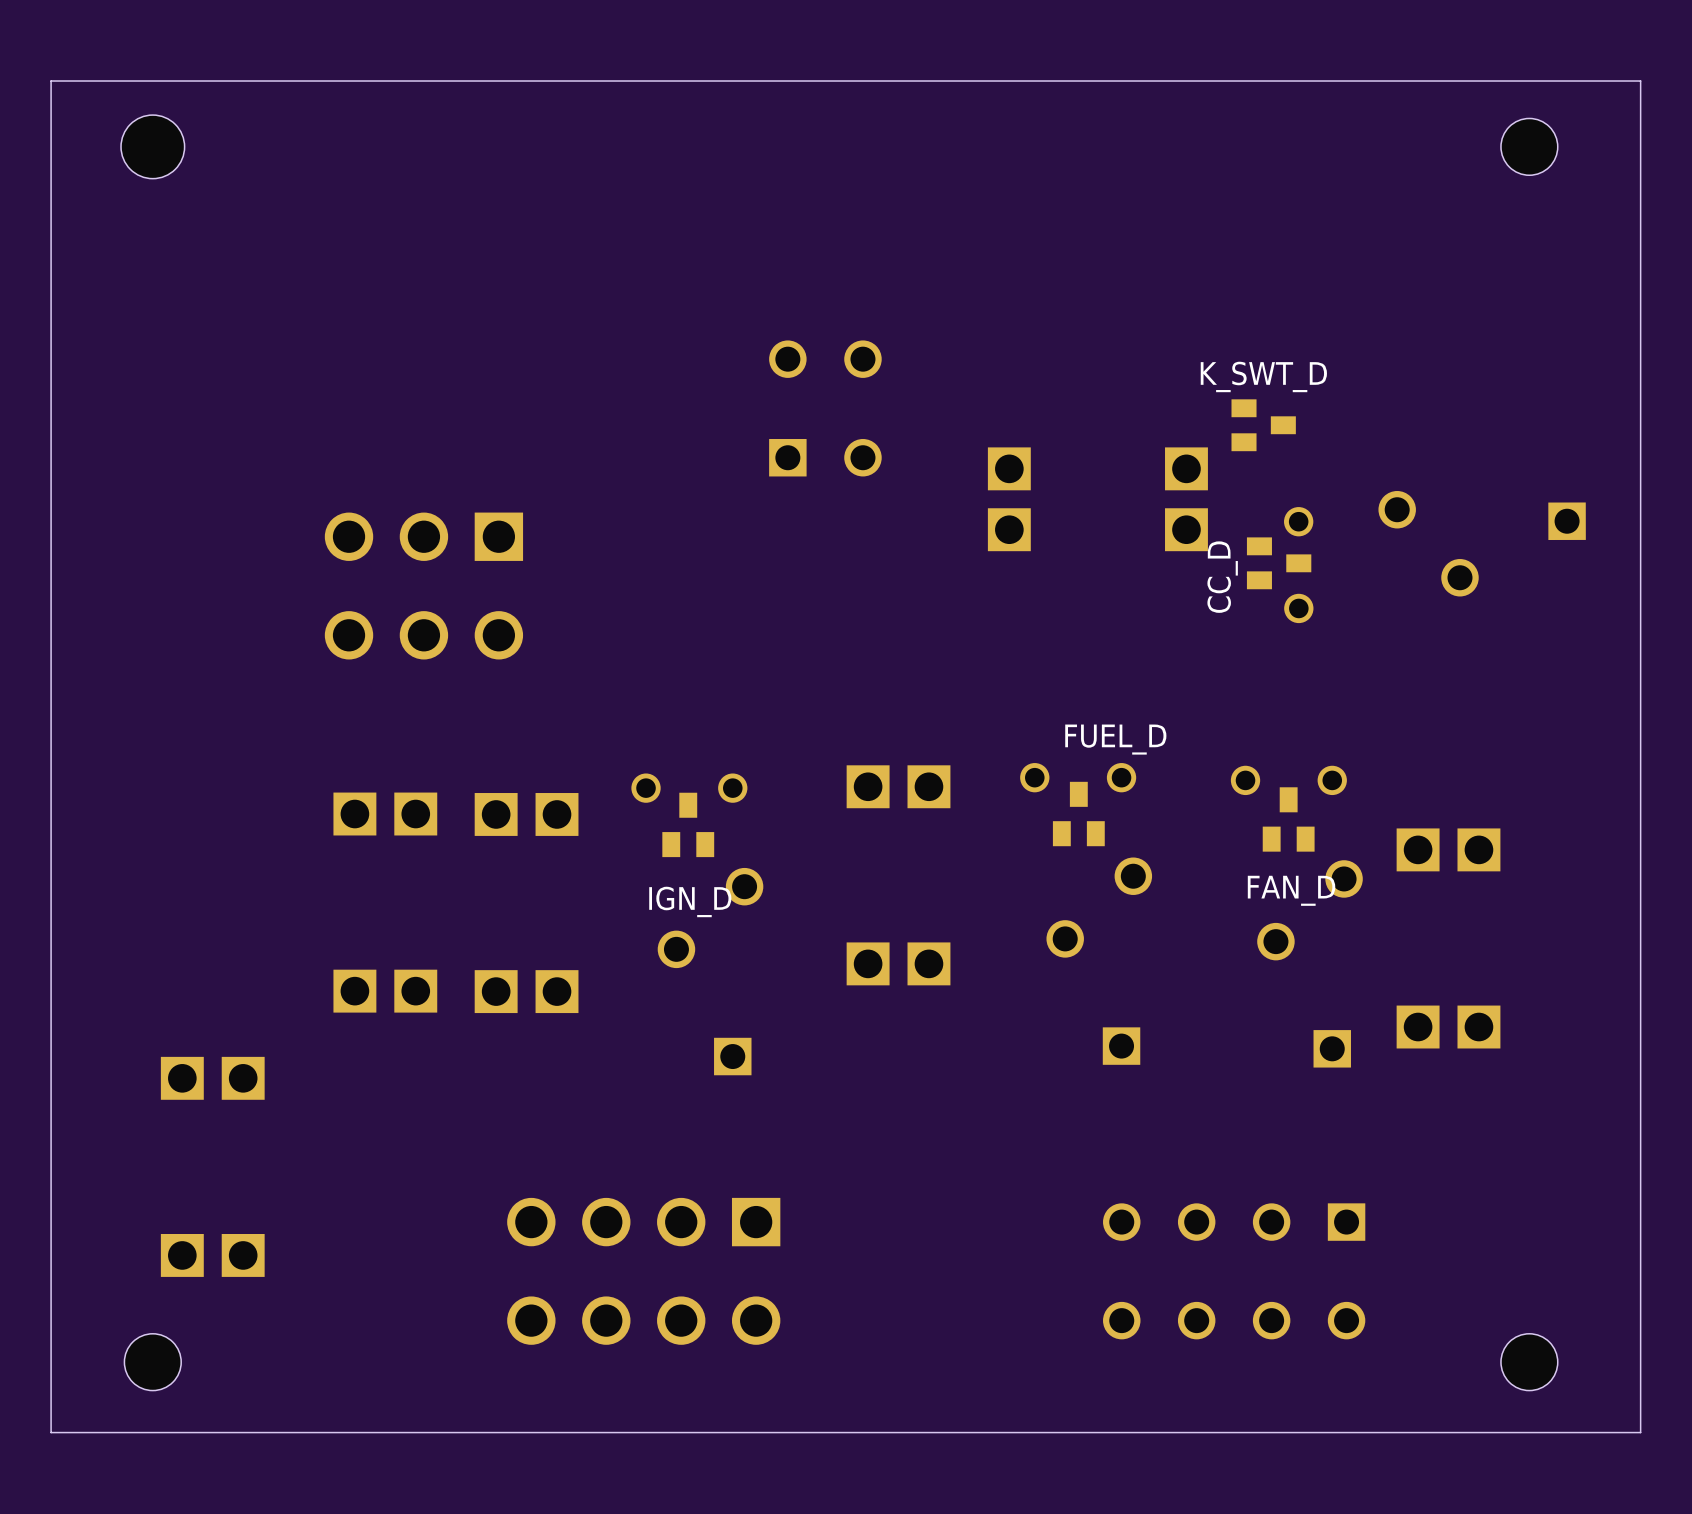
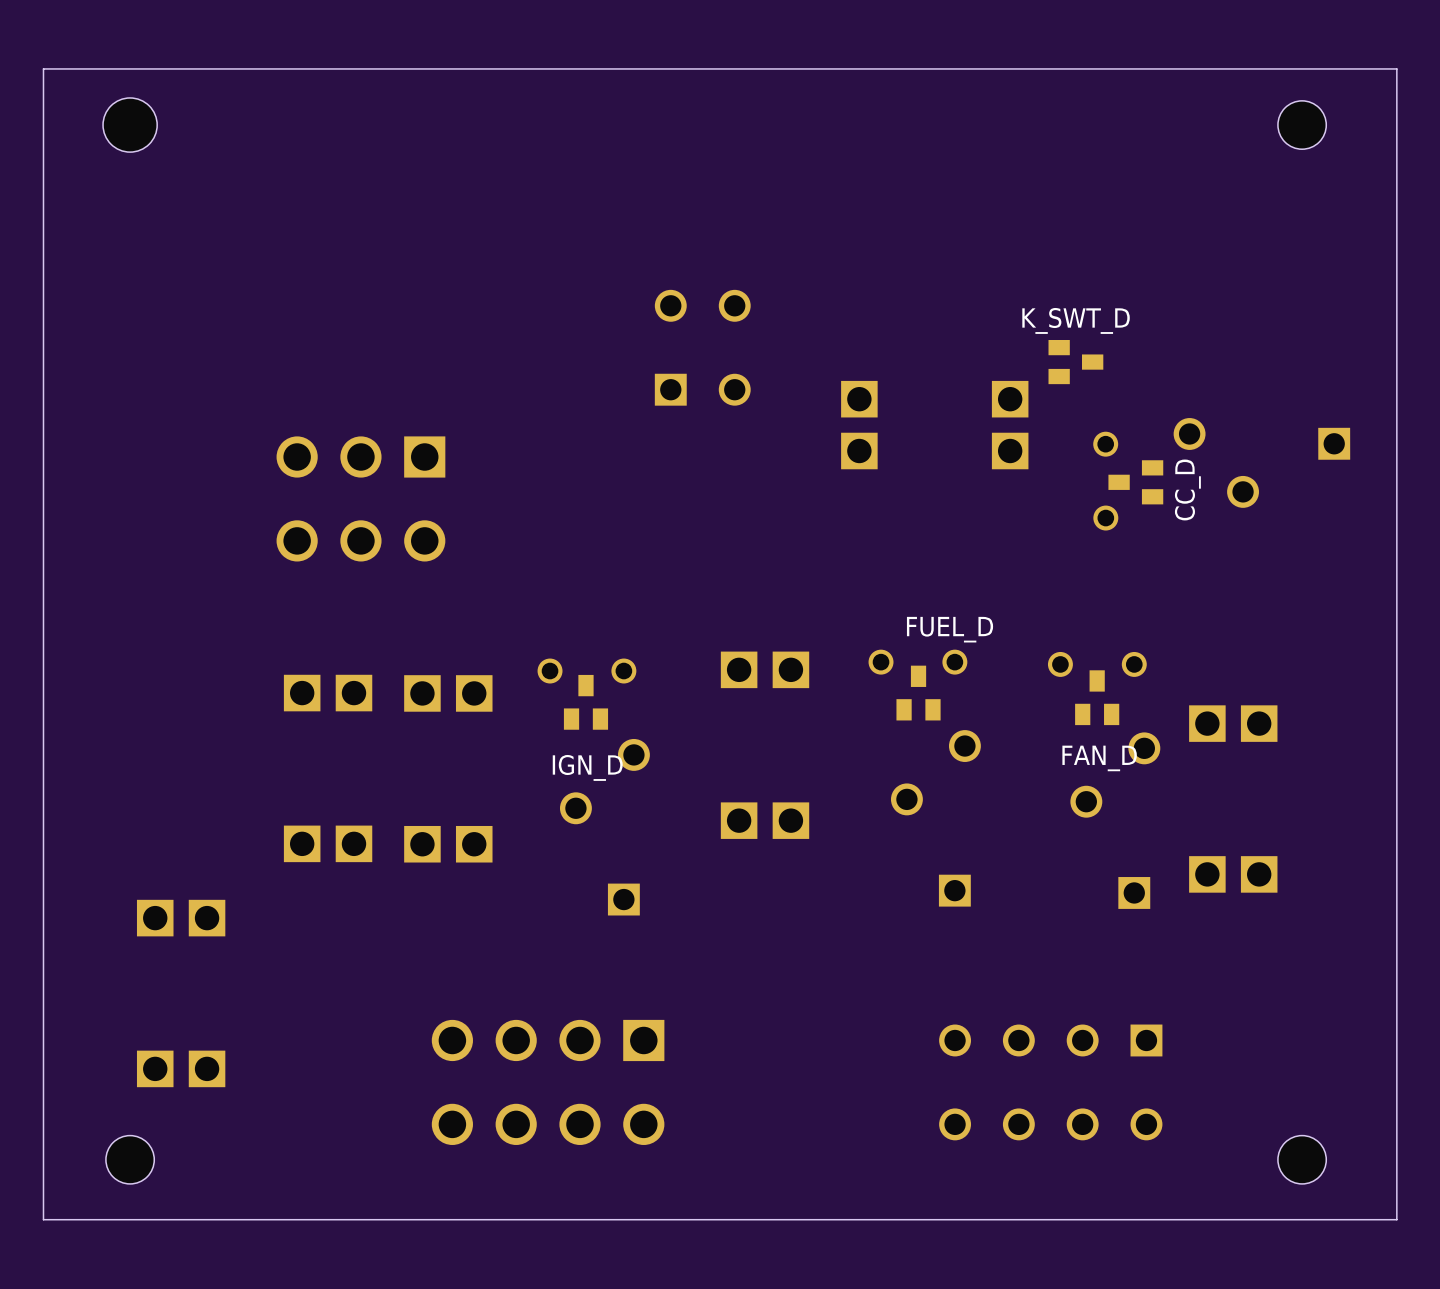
CC_D rotation: 0° (1279, 563) -> 180° (1135, 482)
CC_D position: (1279, 563) -> (1135, 482)

